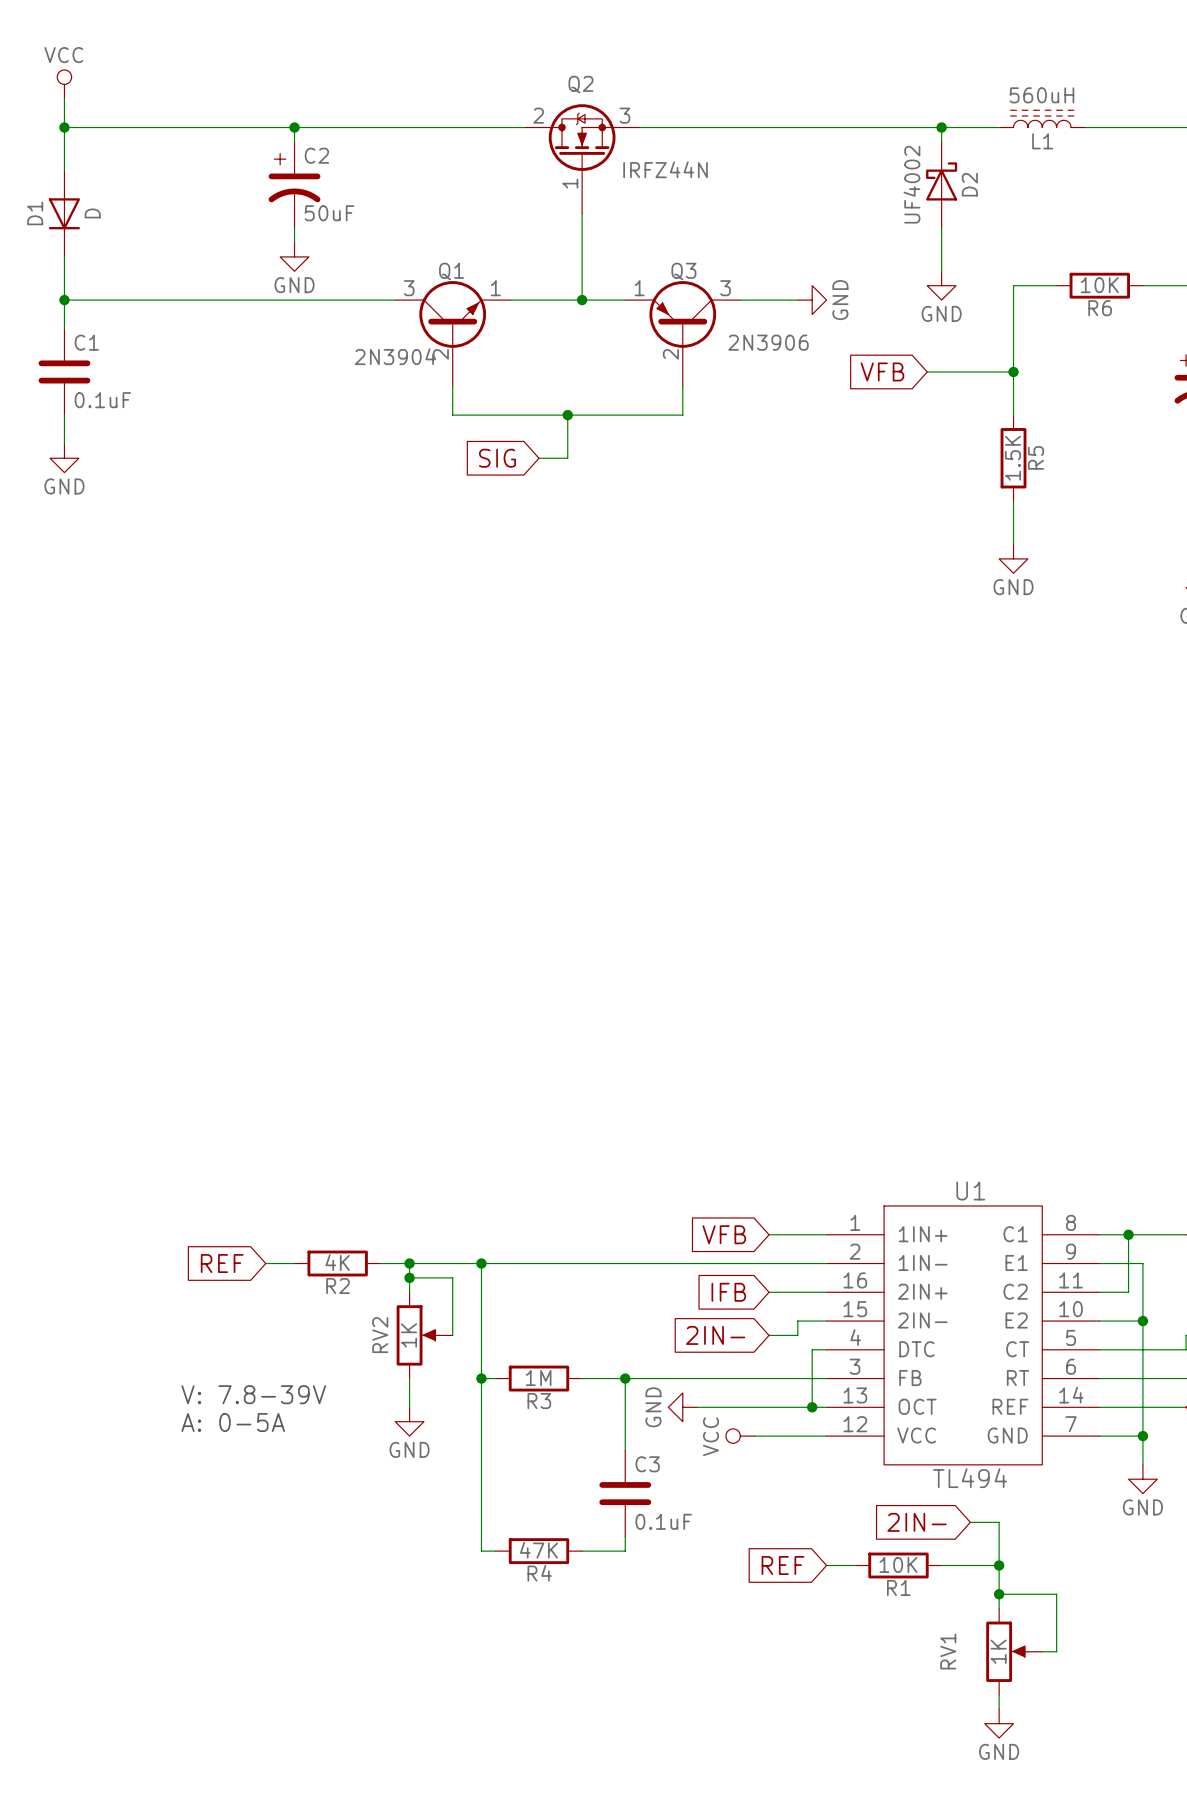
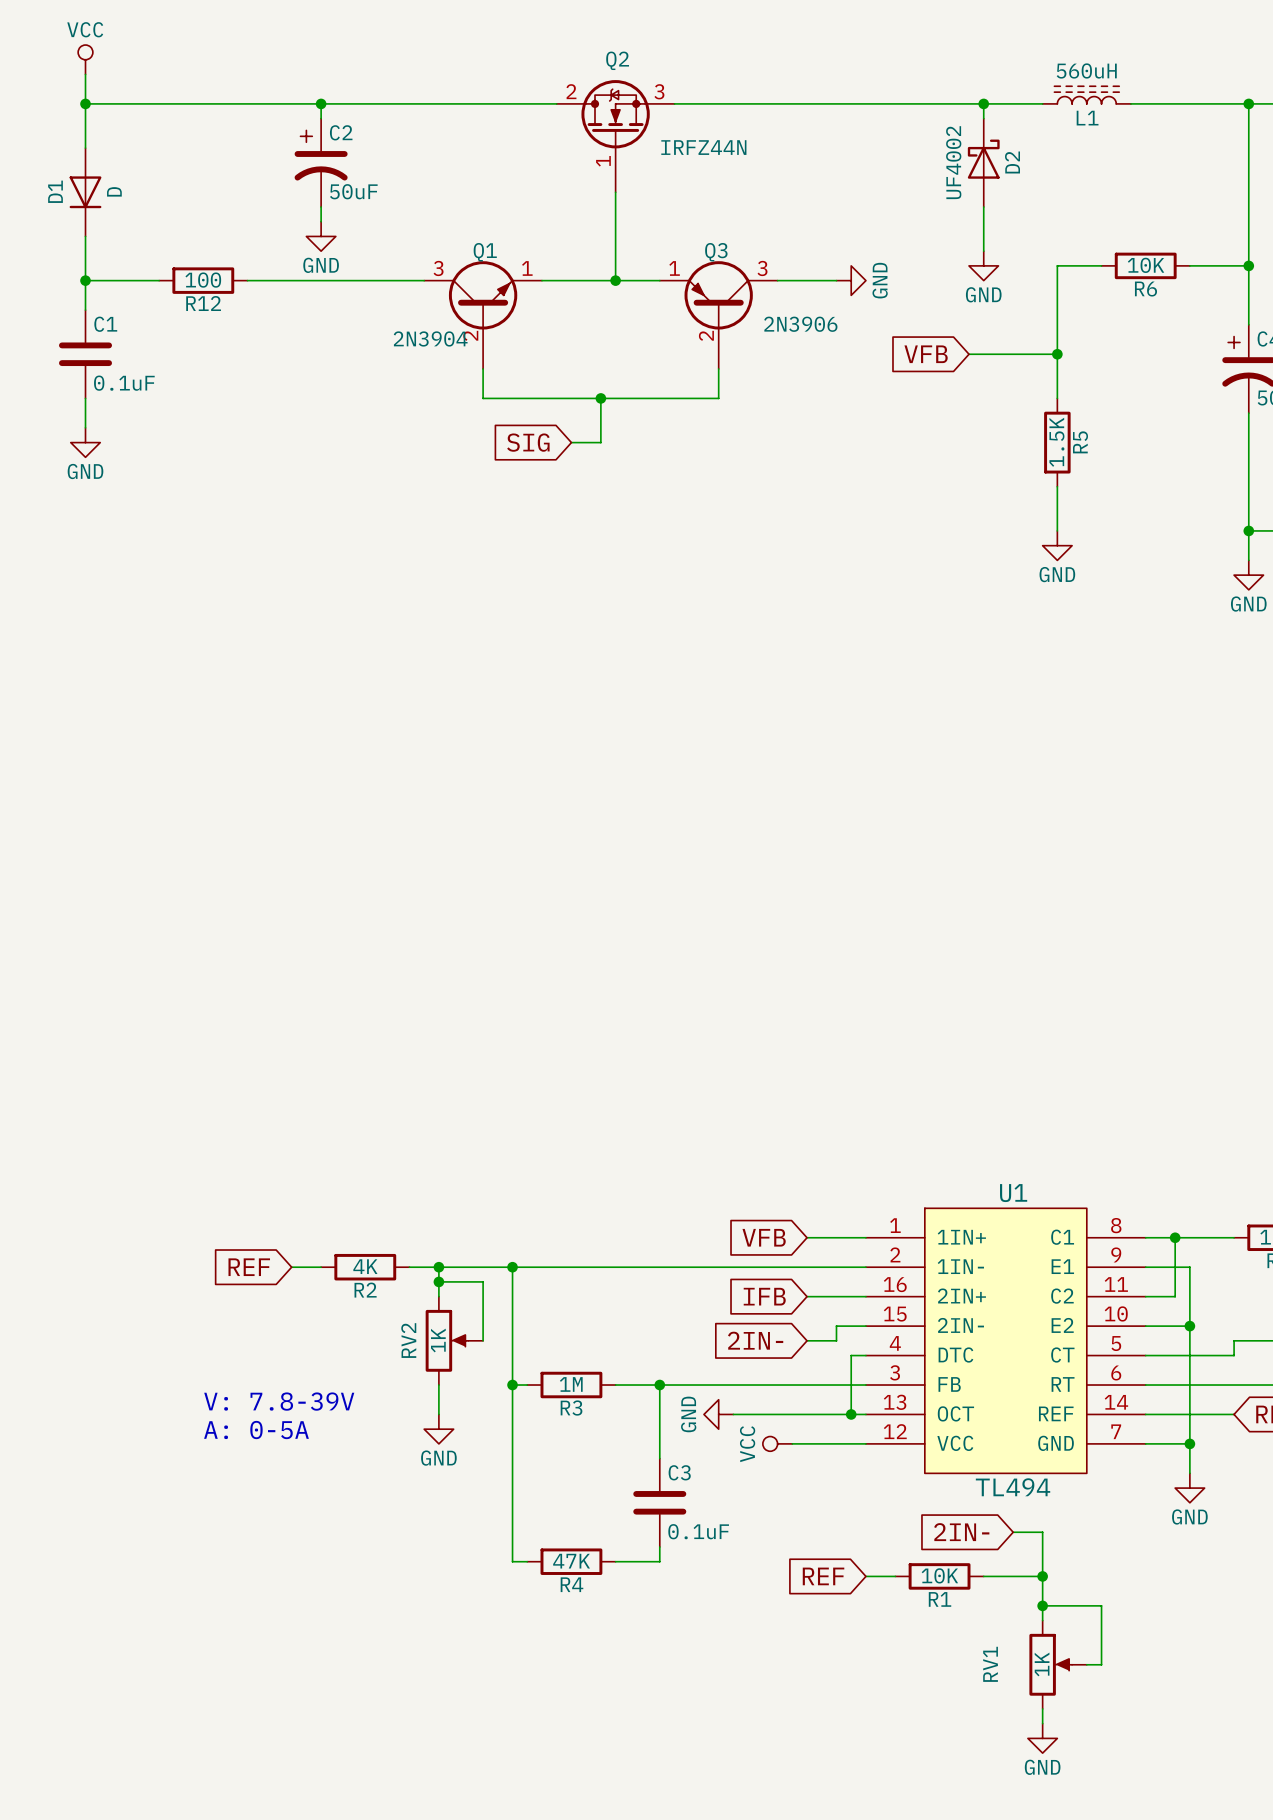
wire: (136, 300) (222, 300) -> none
R12: none -> 100 (203, 280)

